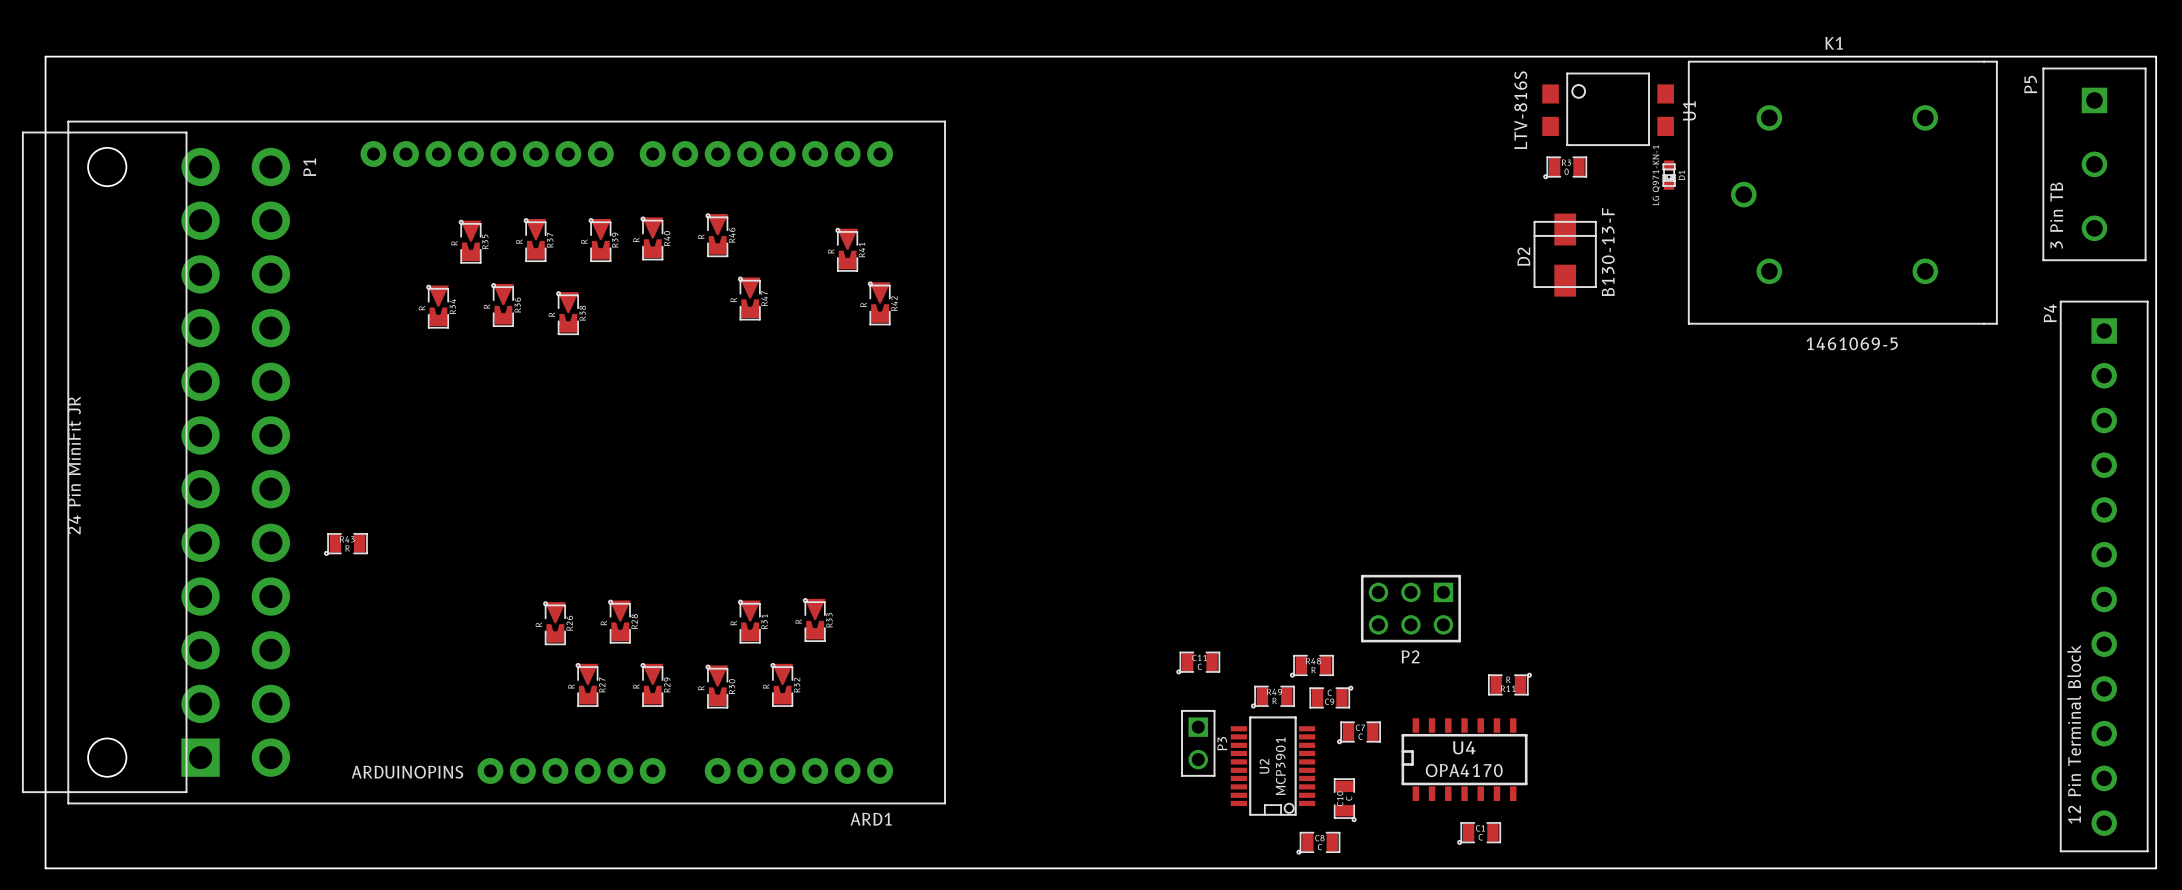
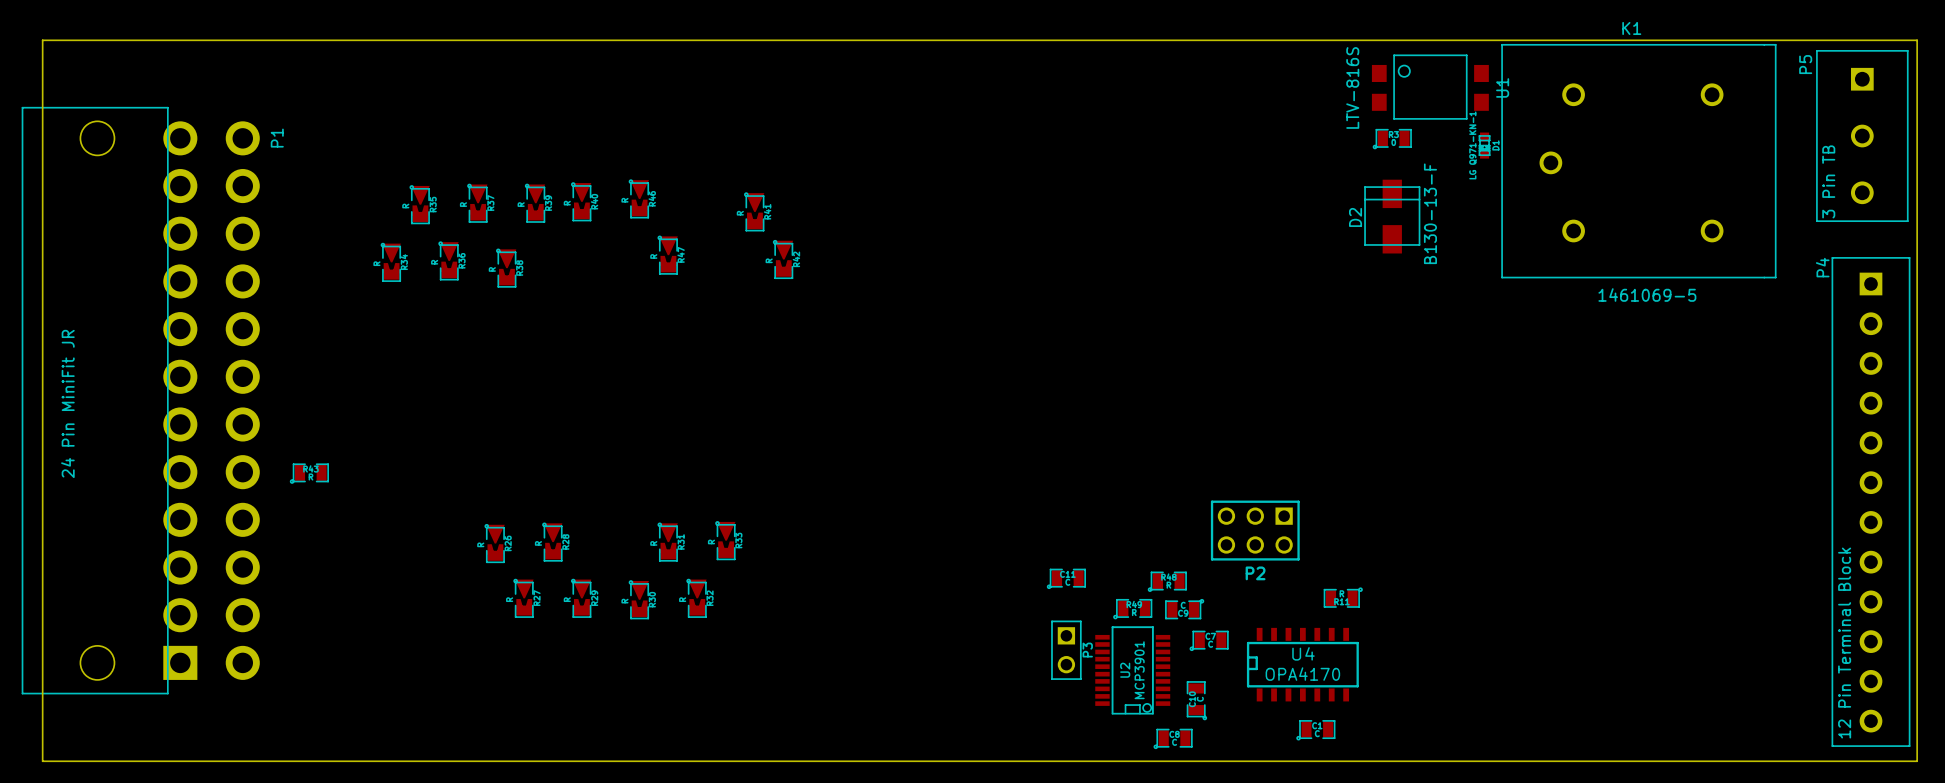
ARD1: ARDUINOPINS (506, 462) -> none

